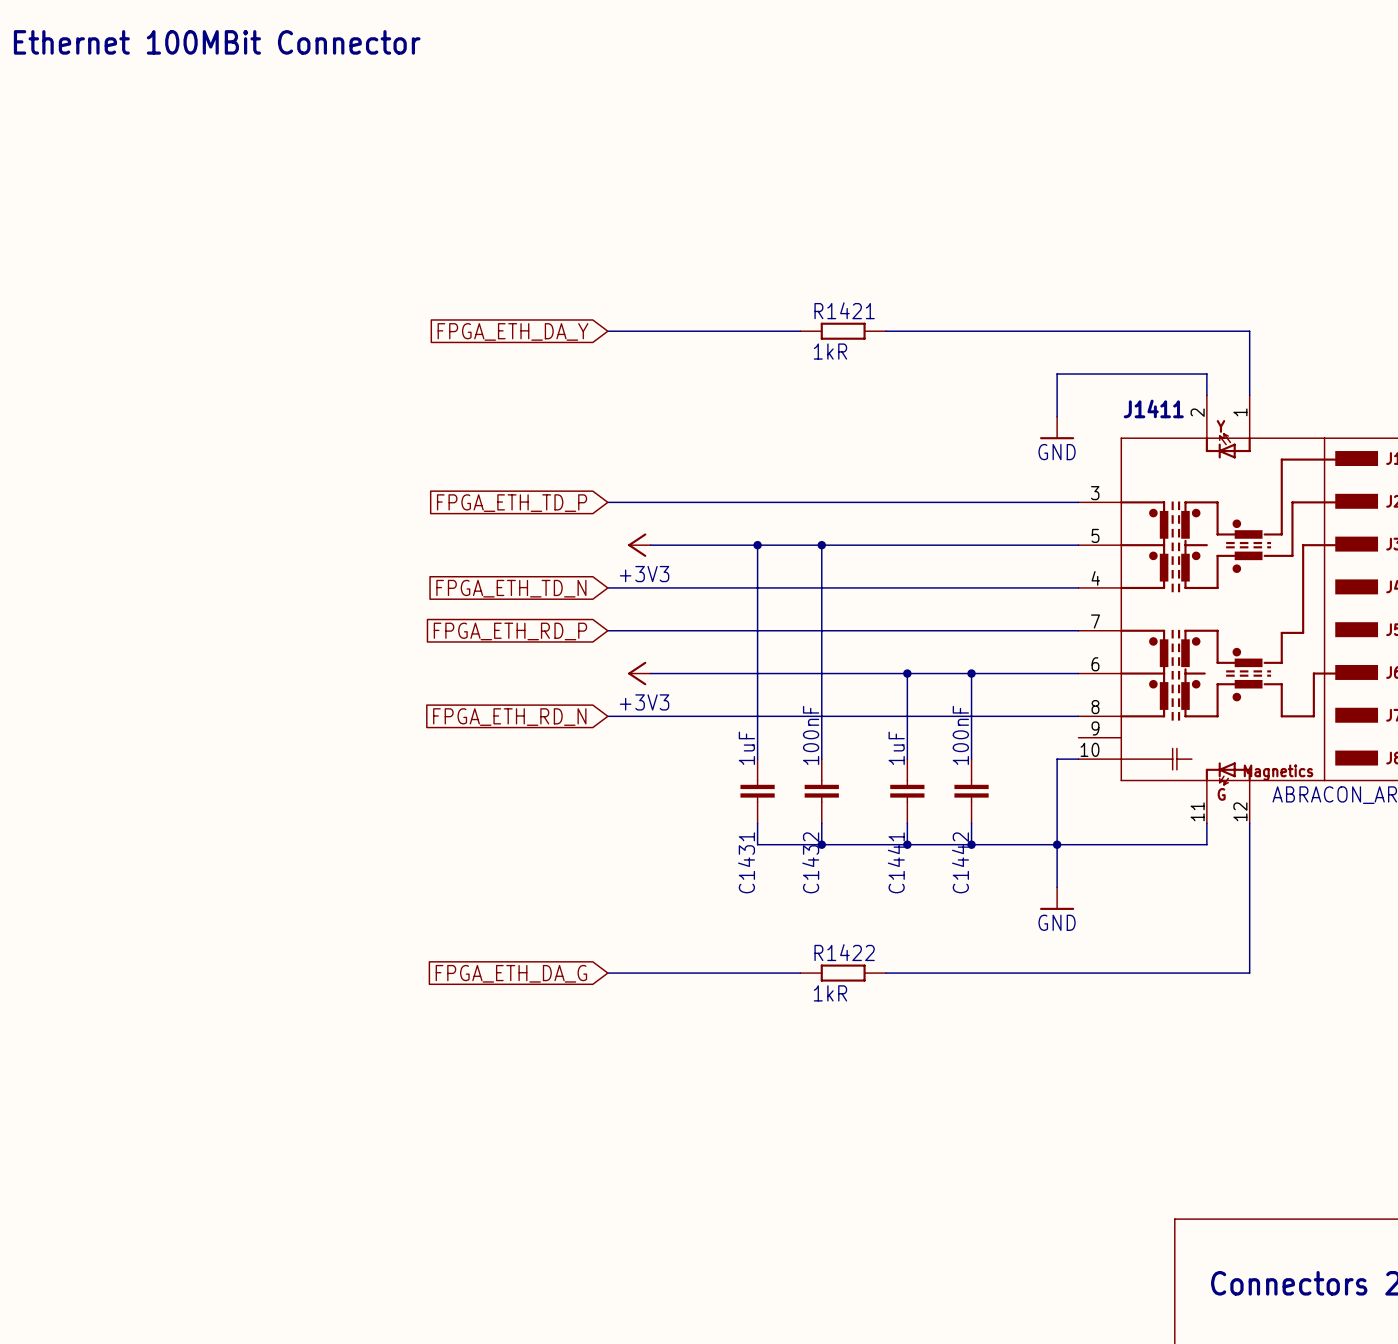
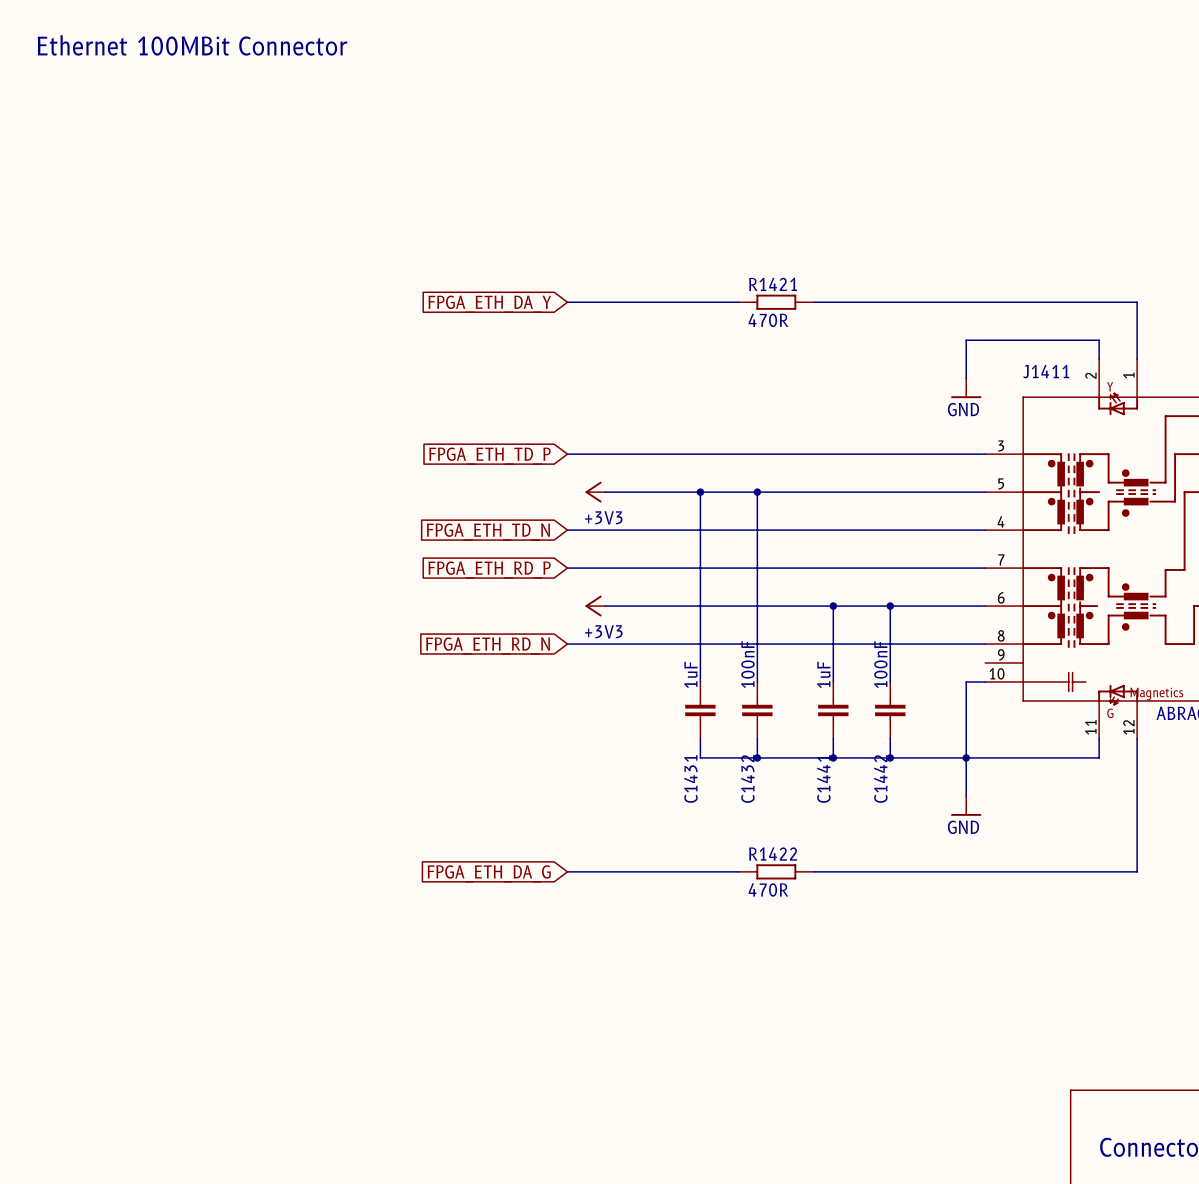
R1421 value: 1kR (830, 351) -> 470R (768, 320)
R1422 value: 1kR (830, 993) -> 470R (768, 889)

